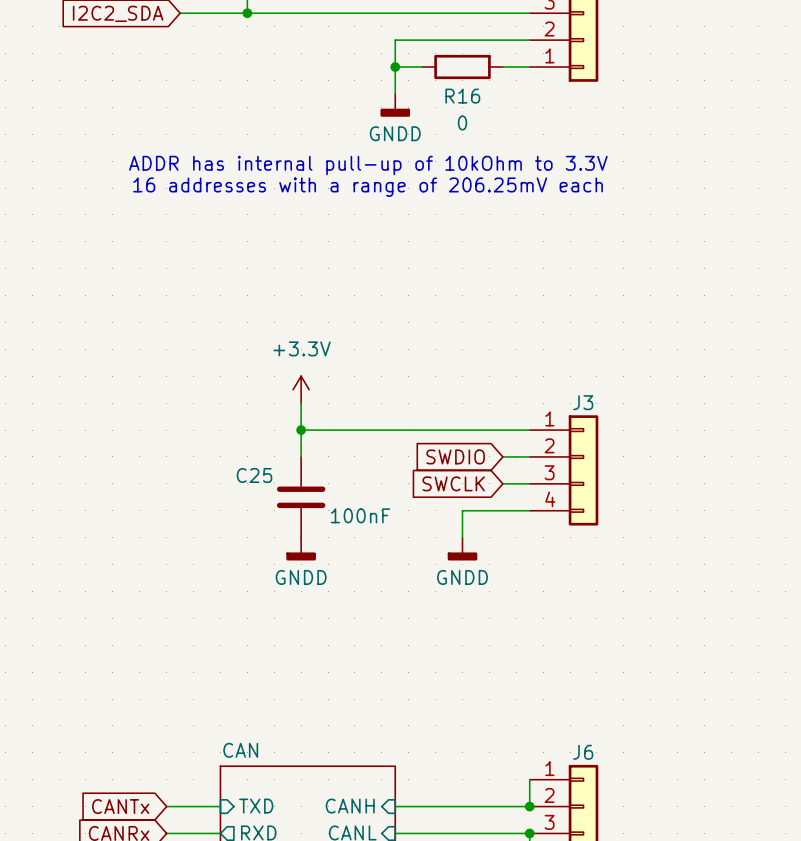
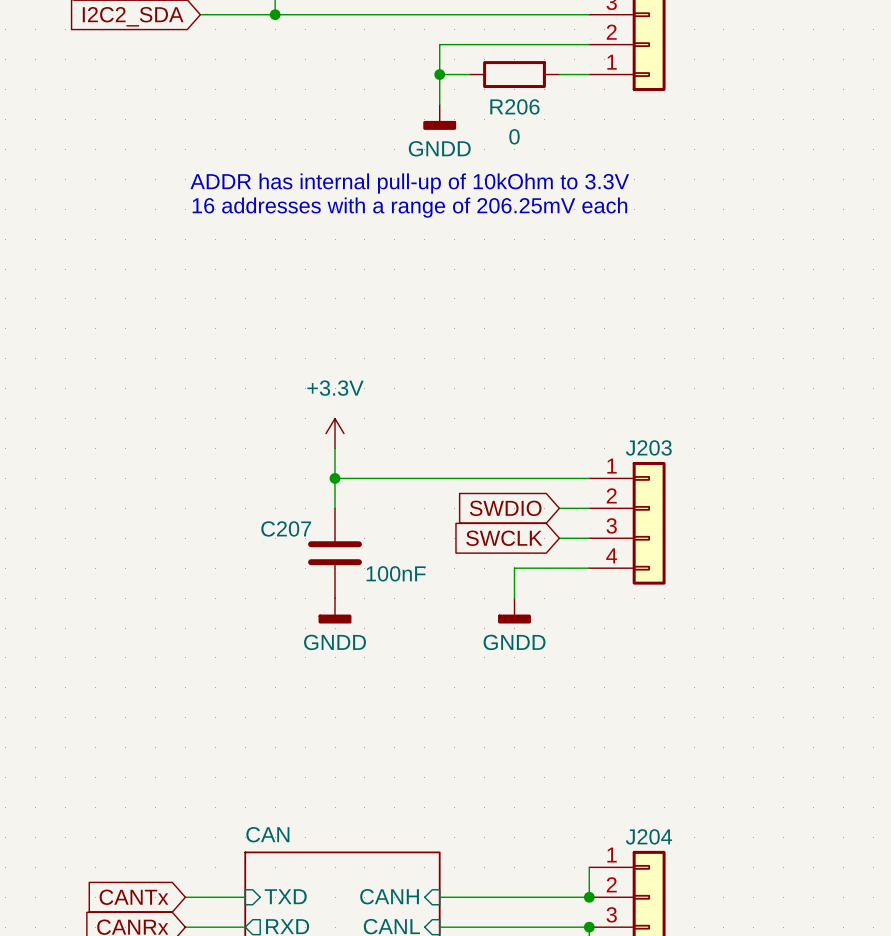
R16 name: R16 (462, 96) -> R206 (514, 106)
J3 name: J3 (583, 402) -> J203 (648, 447)
C25 name: C25 (254, 475) -> C207 (286, 528)
J6 name: J6 (583, 752) -> J204 (648, 836)

